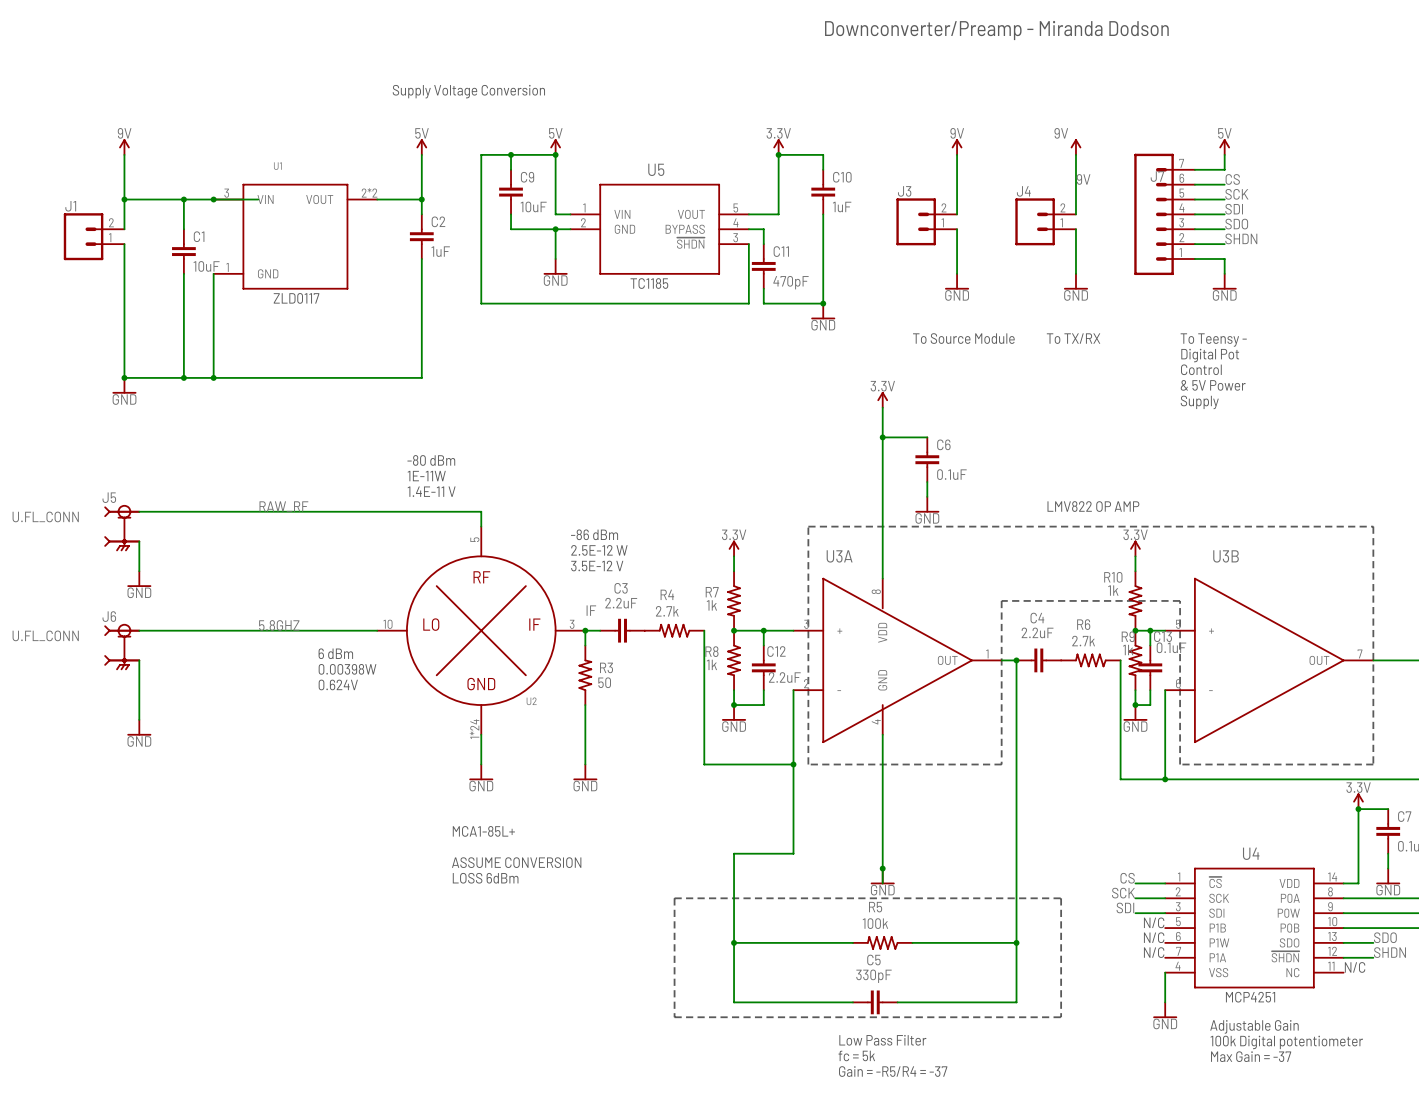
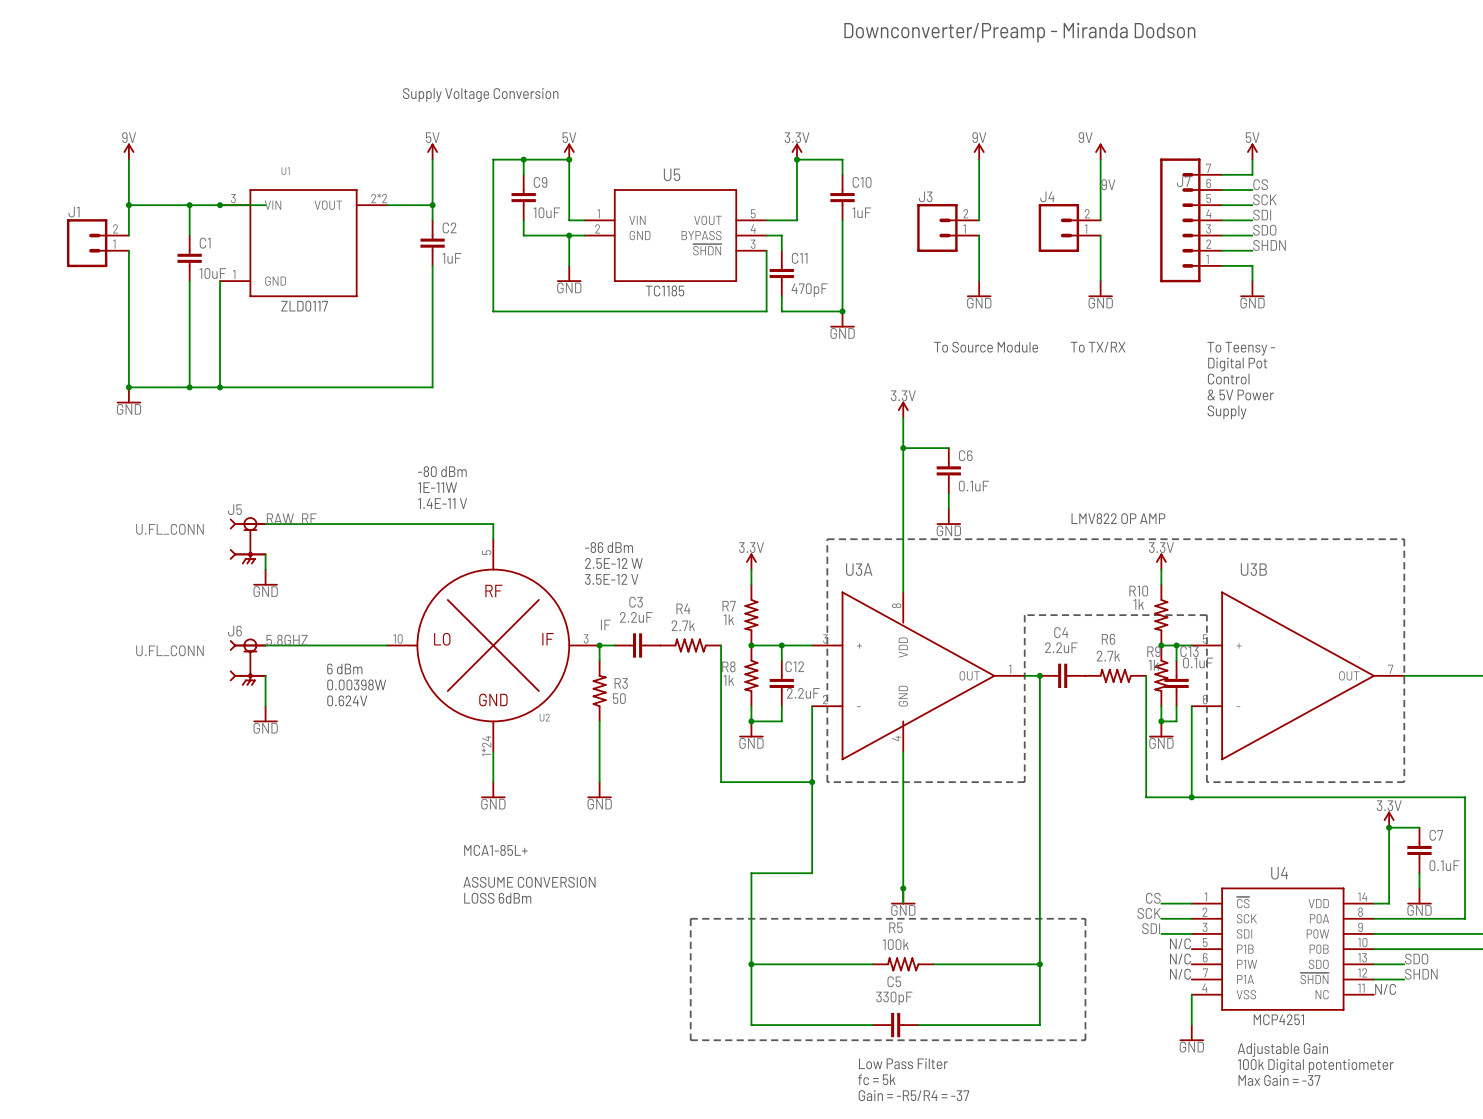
wire: (139, 511) (258, 511) -> none
J5 position: (122, 528) -> (248, 540)
wire: (139, 541) (139, 571) -> none
wire: none -> (265, 554) (265, 569)
power symbol: none -> GND (265, 577)
power symbol: GND (139, 579) -> none
wire: (139, 630) (258, 630) -> none
J6 position: (122, 647) -> (248, 662)
wire: (139, 660) (139, 719) -> none
wire: none -> (265, 675) (265, 706)
power symbol: none -> GND (265, 714)
power symbol: GND (139, 727) -> none

